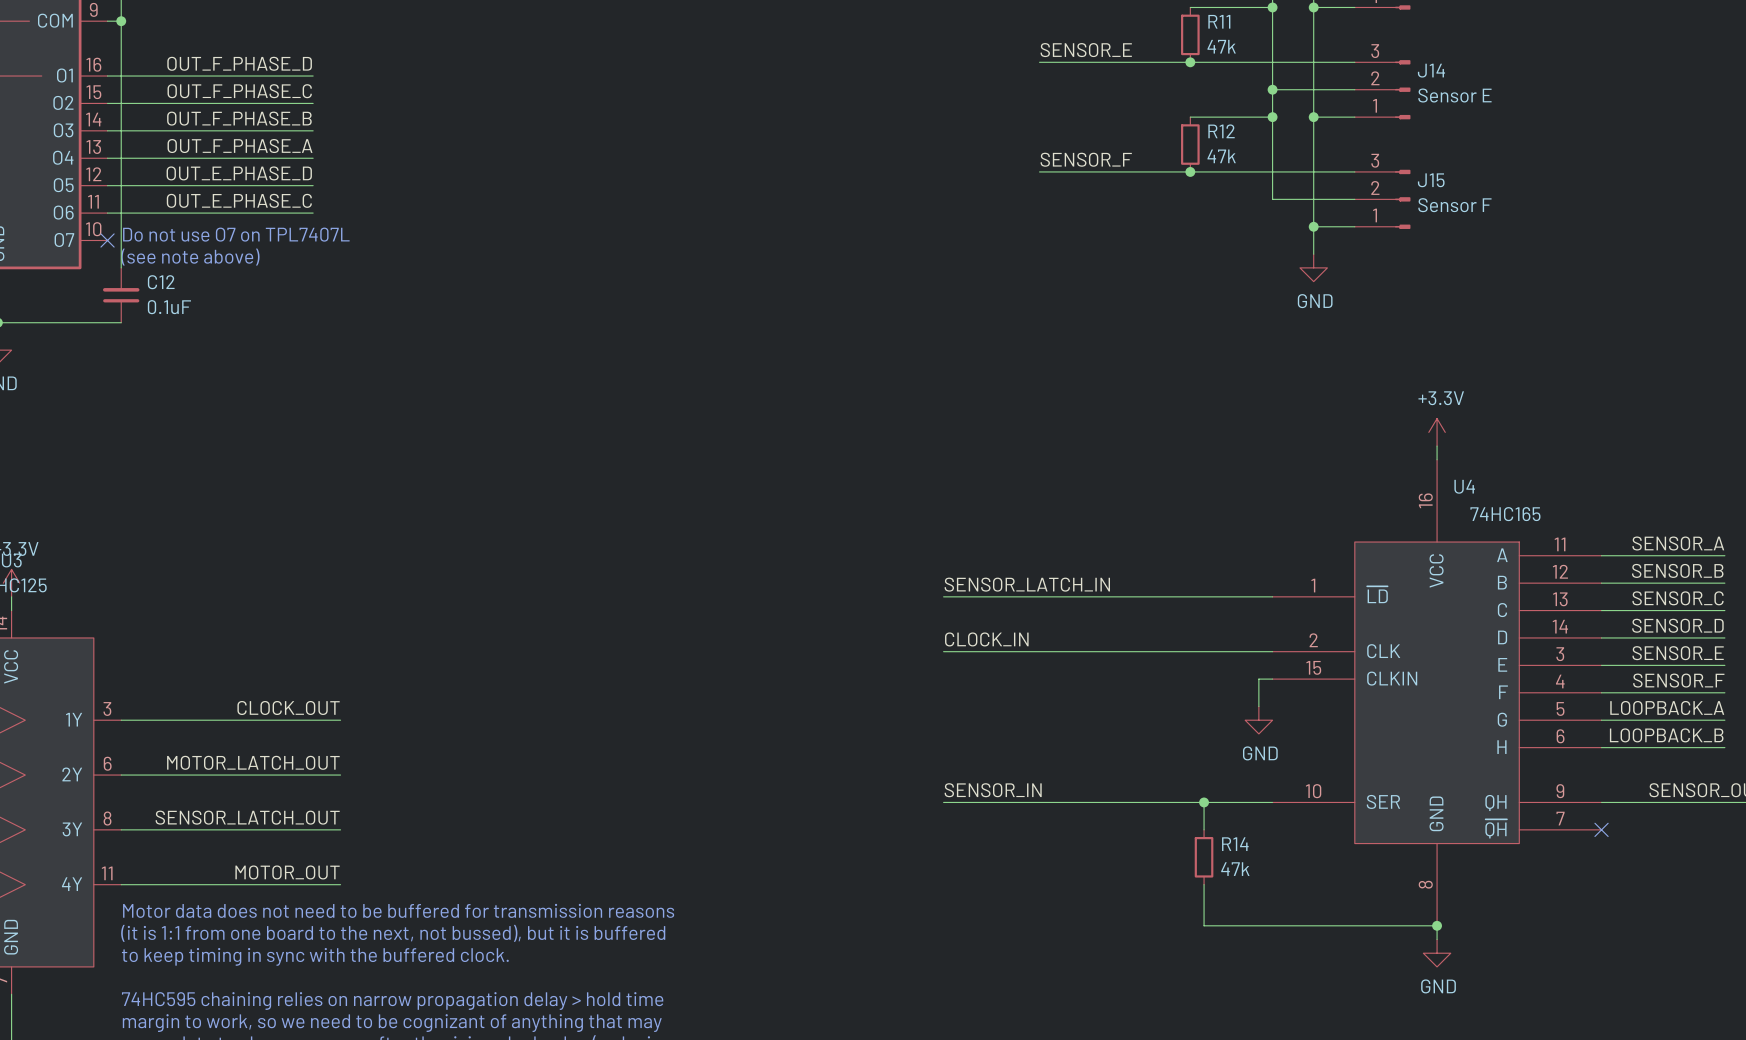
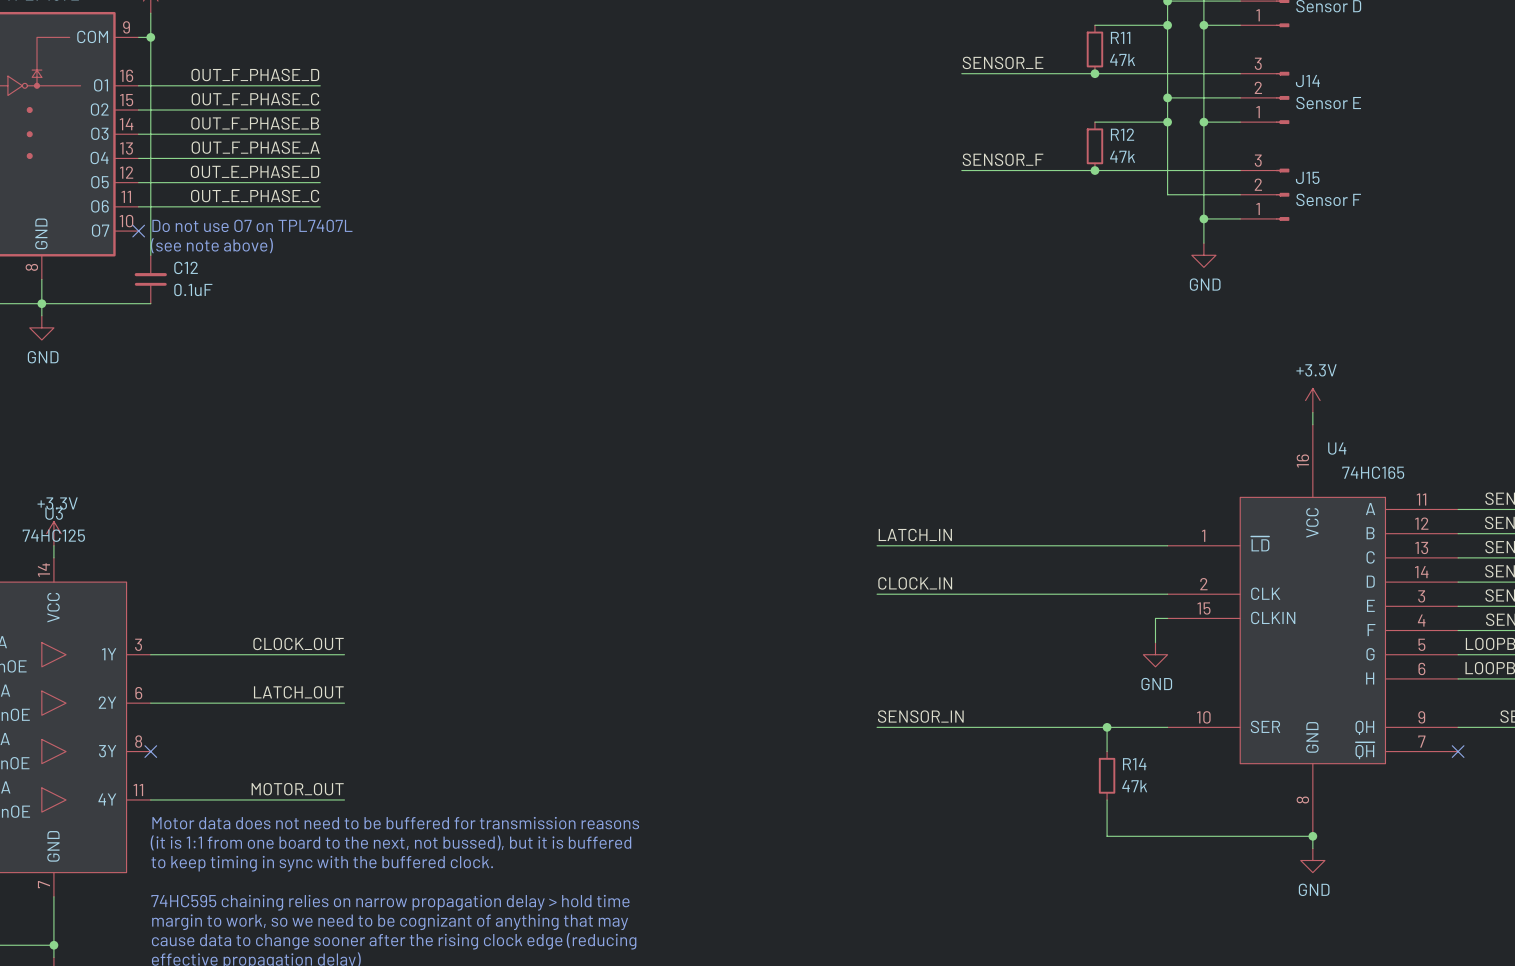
label: SENSOR_LATCH_IN (1027, 584) -> LATCH_IN (915, 534)
label: MOTOR_LATCH_OUT (253, 762) -> LATCH_OUT (298, 692)
label: SENSOR_LATCH_OUT (247, 817) -> none
wire: (121, 829) (340, 829) -> none
no-connect mark: none -> (150, 751)

